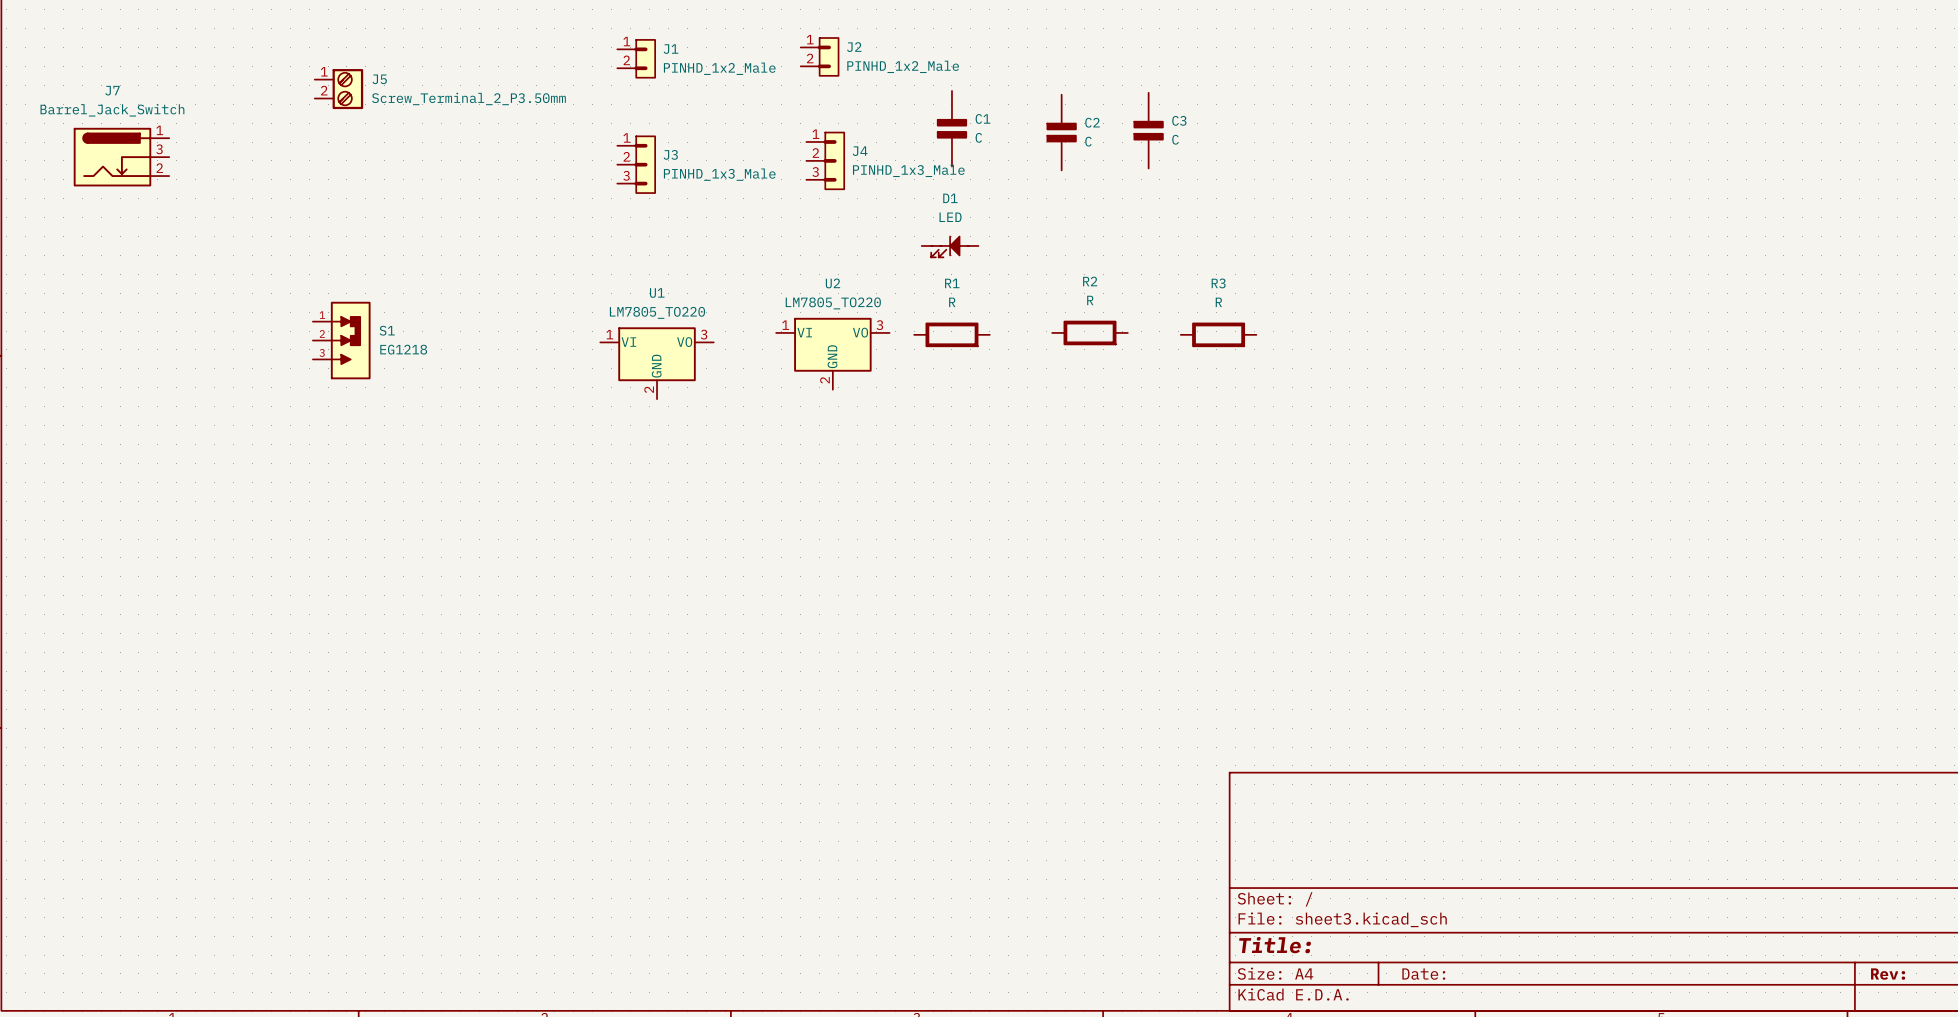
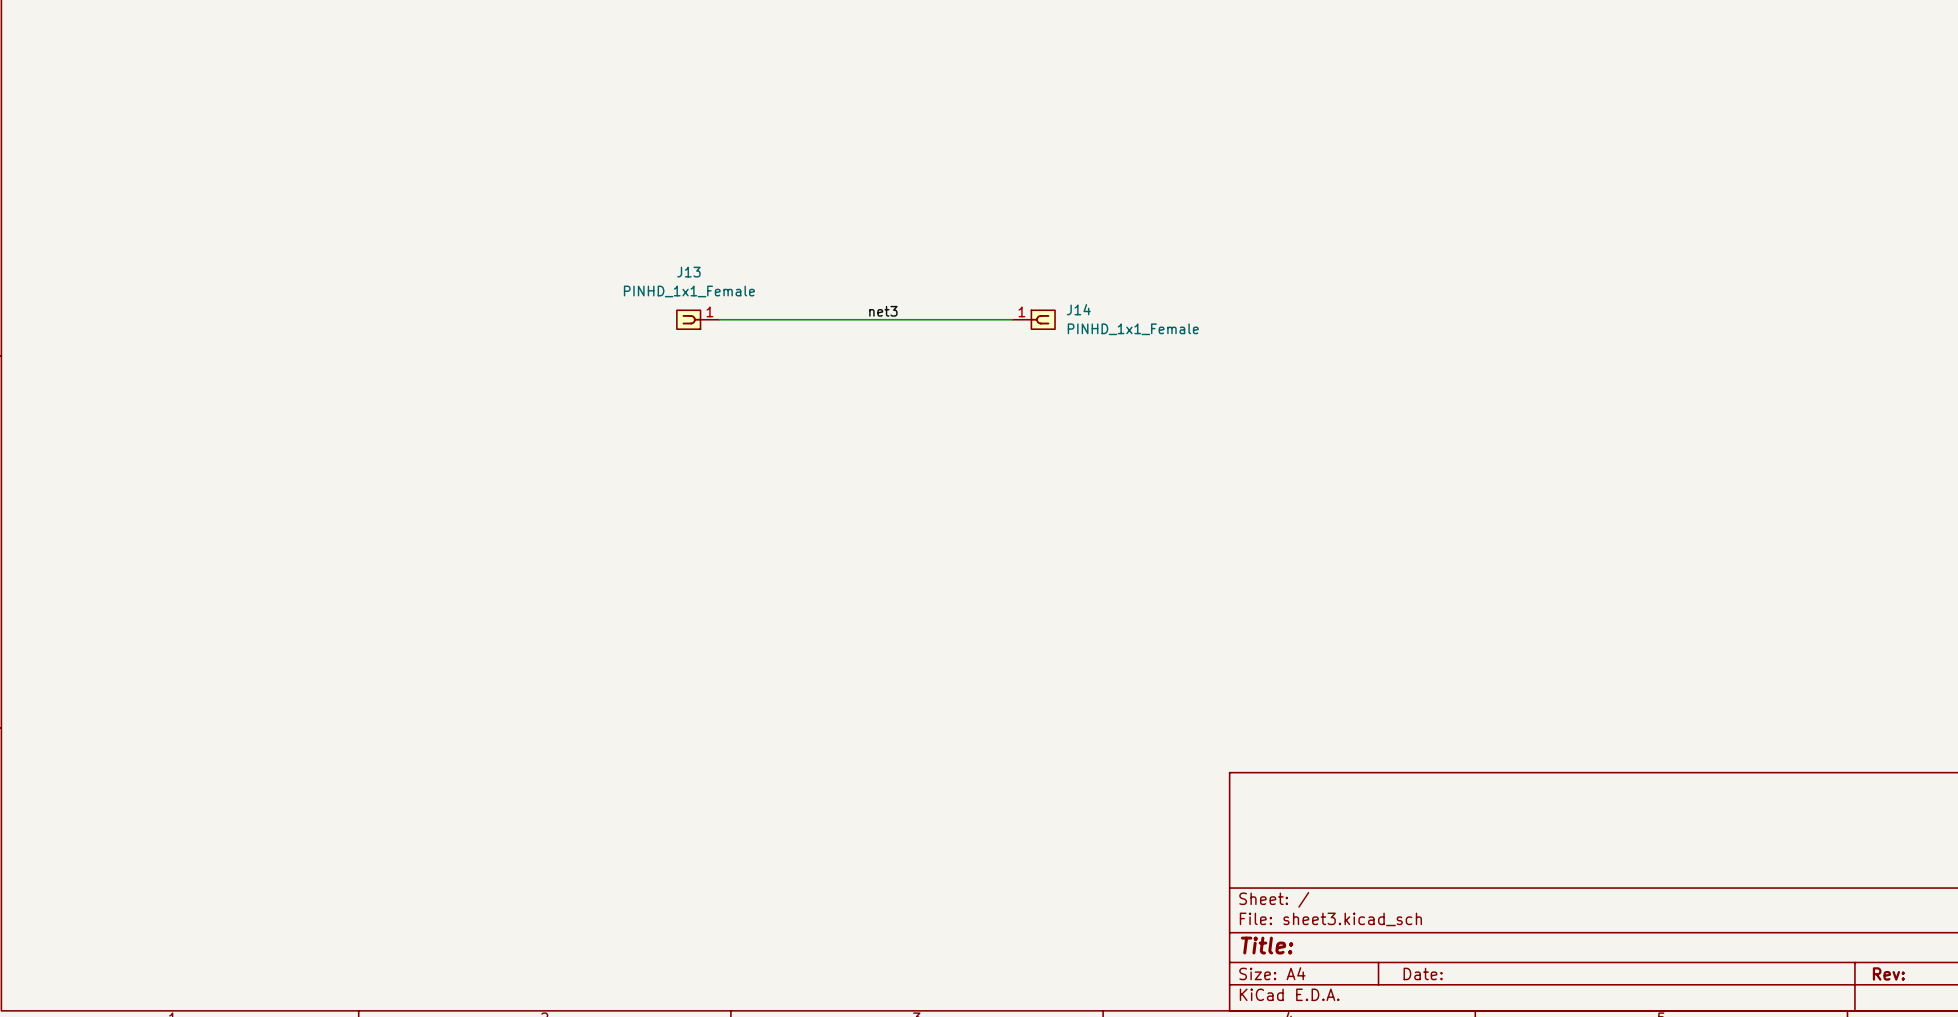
J2: PINHD_1x2_Male (819, 56) -> none
J1: PINHD_1x2_Male (636, 58) -> none
J5: Screw_Terminal_2_P3.50mm (338, 89) -> none
C1: C (951, 128) -> none
C3: C (1148, 130) -> none
C2: C (1061, 132) -> none
J7: Barrel_Jack_Switch (121, 157) -> none
J4: PINHD_1x3_Male (825, 160) -> none
J3: PINHD_1x3_Male (636, 164) -> none
D1: LED (950, 246) -> none
label: none -> net3 (883, 311)
J13: none -> PINHD_1x1_Female (698, 319)
wire: none -> (719, 319) (1012, 319)
J14: none -> PINHD_1x1_Female (1033, 319)
R2: R (1090, 332) -> none
R1: R (951, 334) -> none
R3: R (1218, 334) -> none
S1: EG1218 (341, 340) -> none
U2: LM7805_TO220 (832, 353) -> none
U1: LM7805_TO220 (657, 363) -> none

